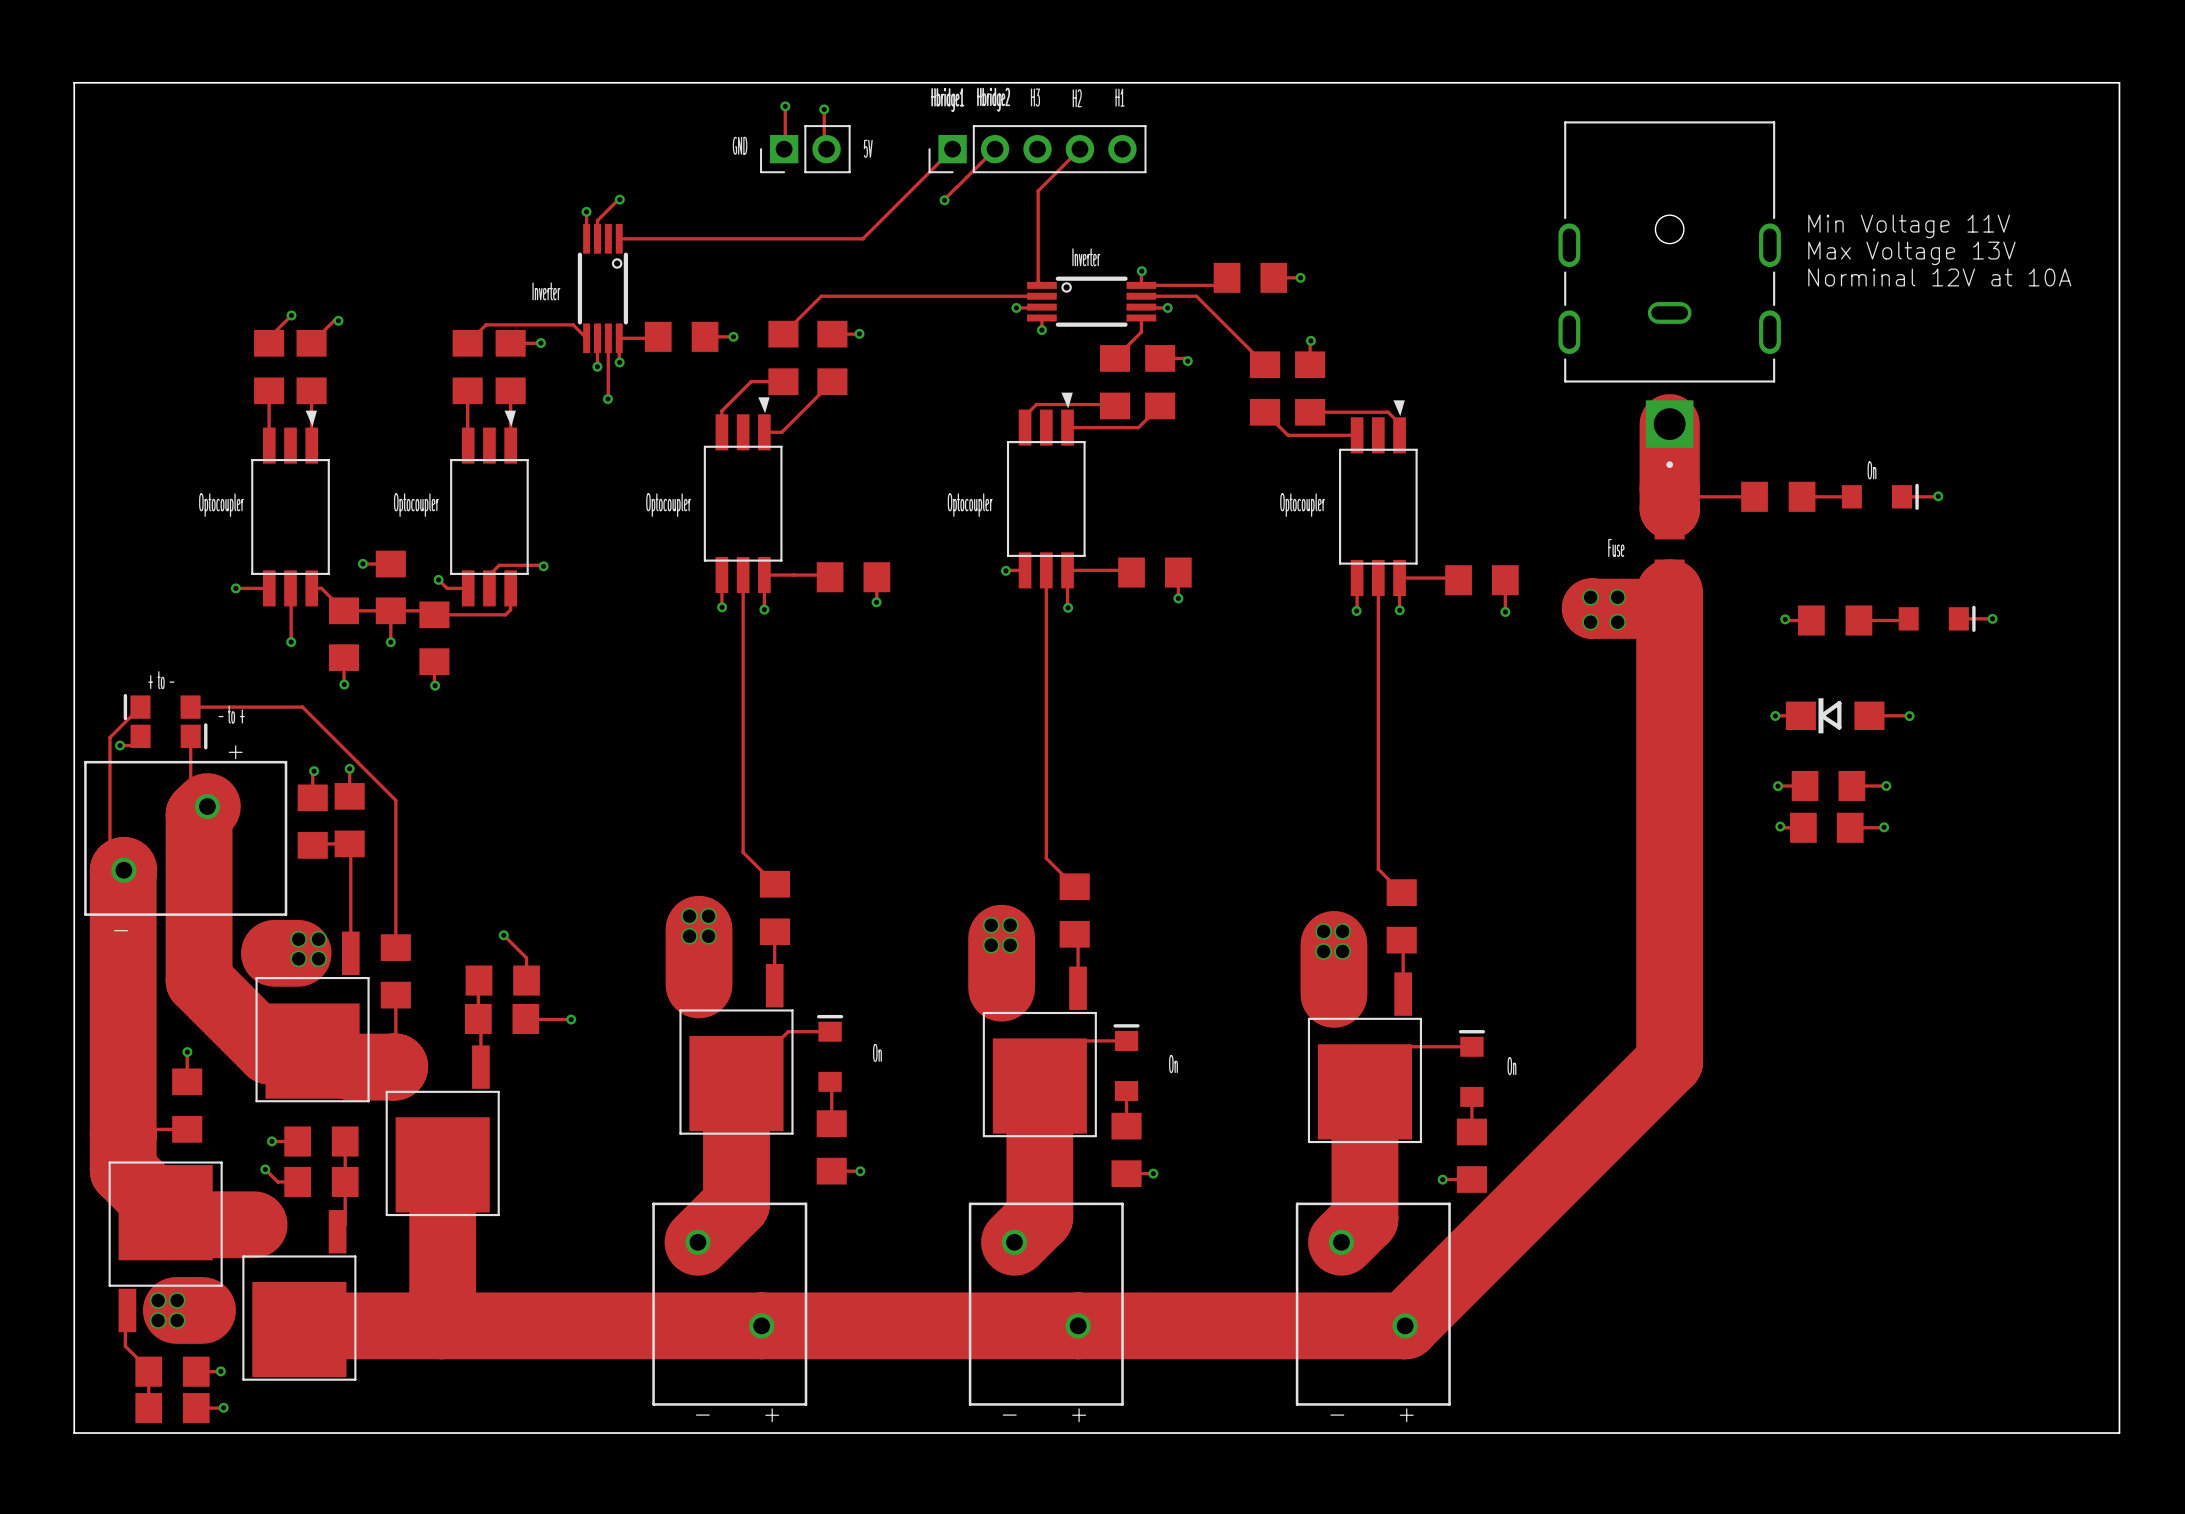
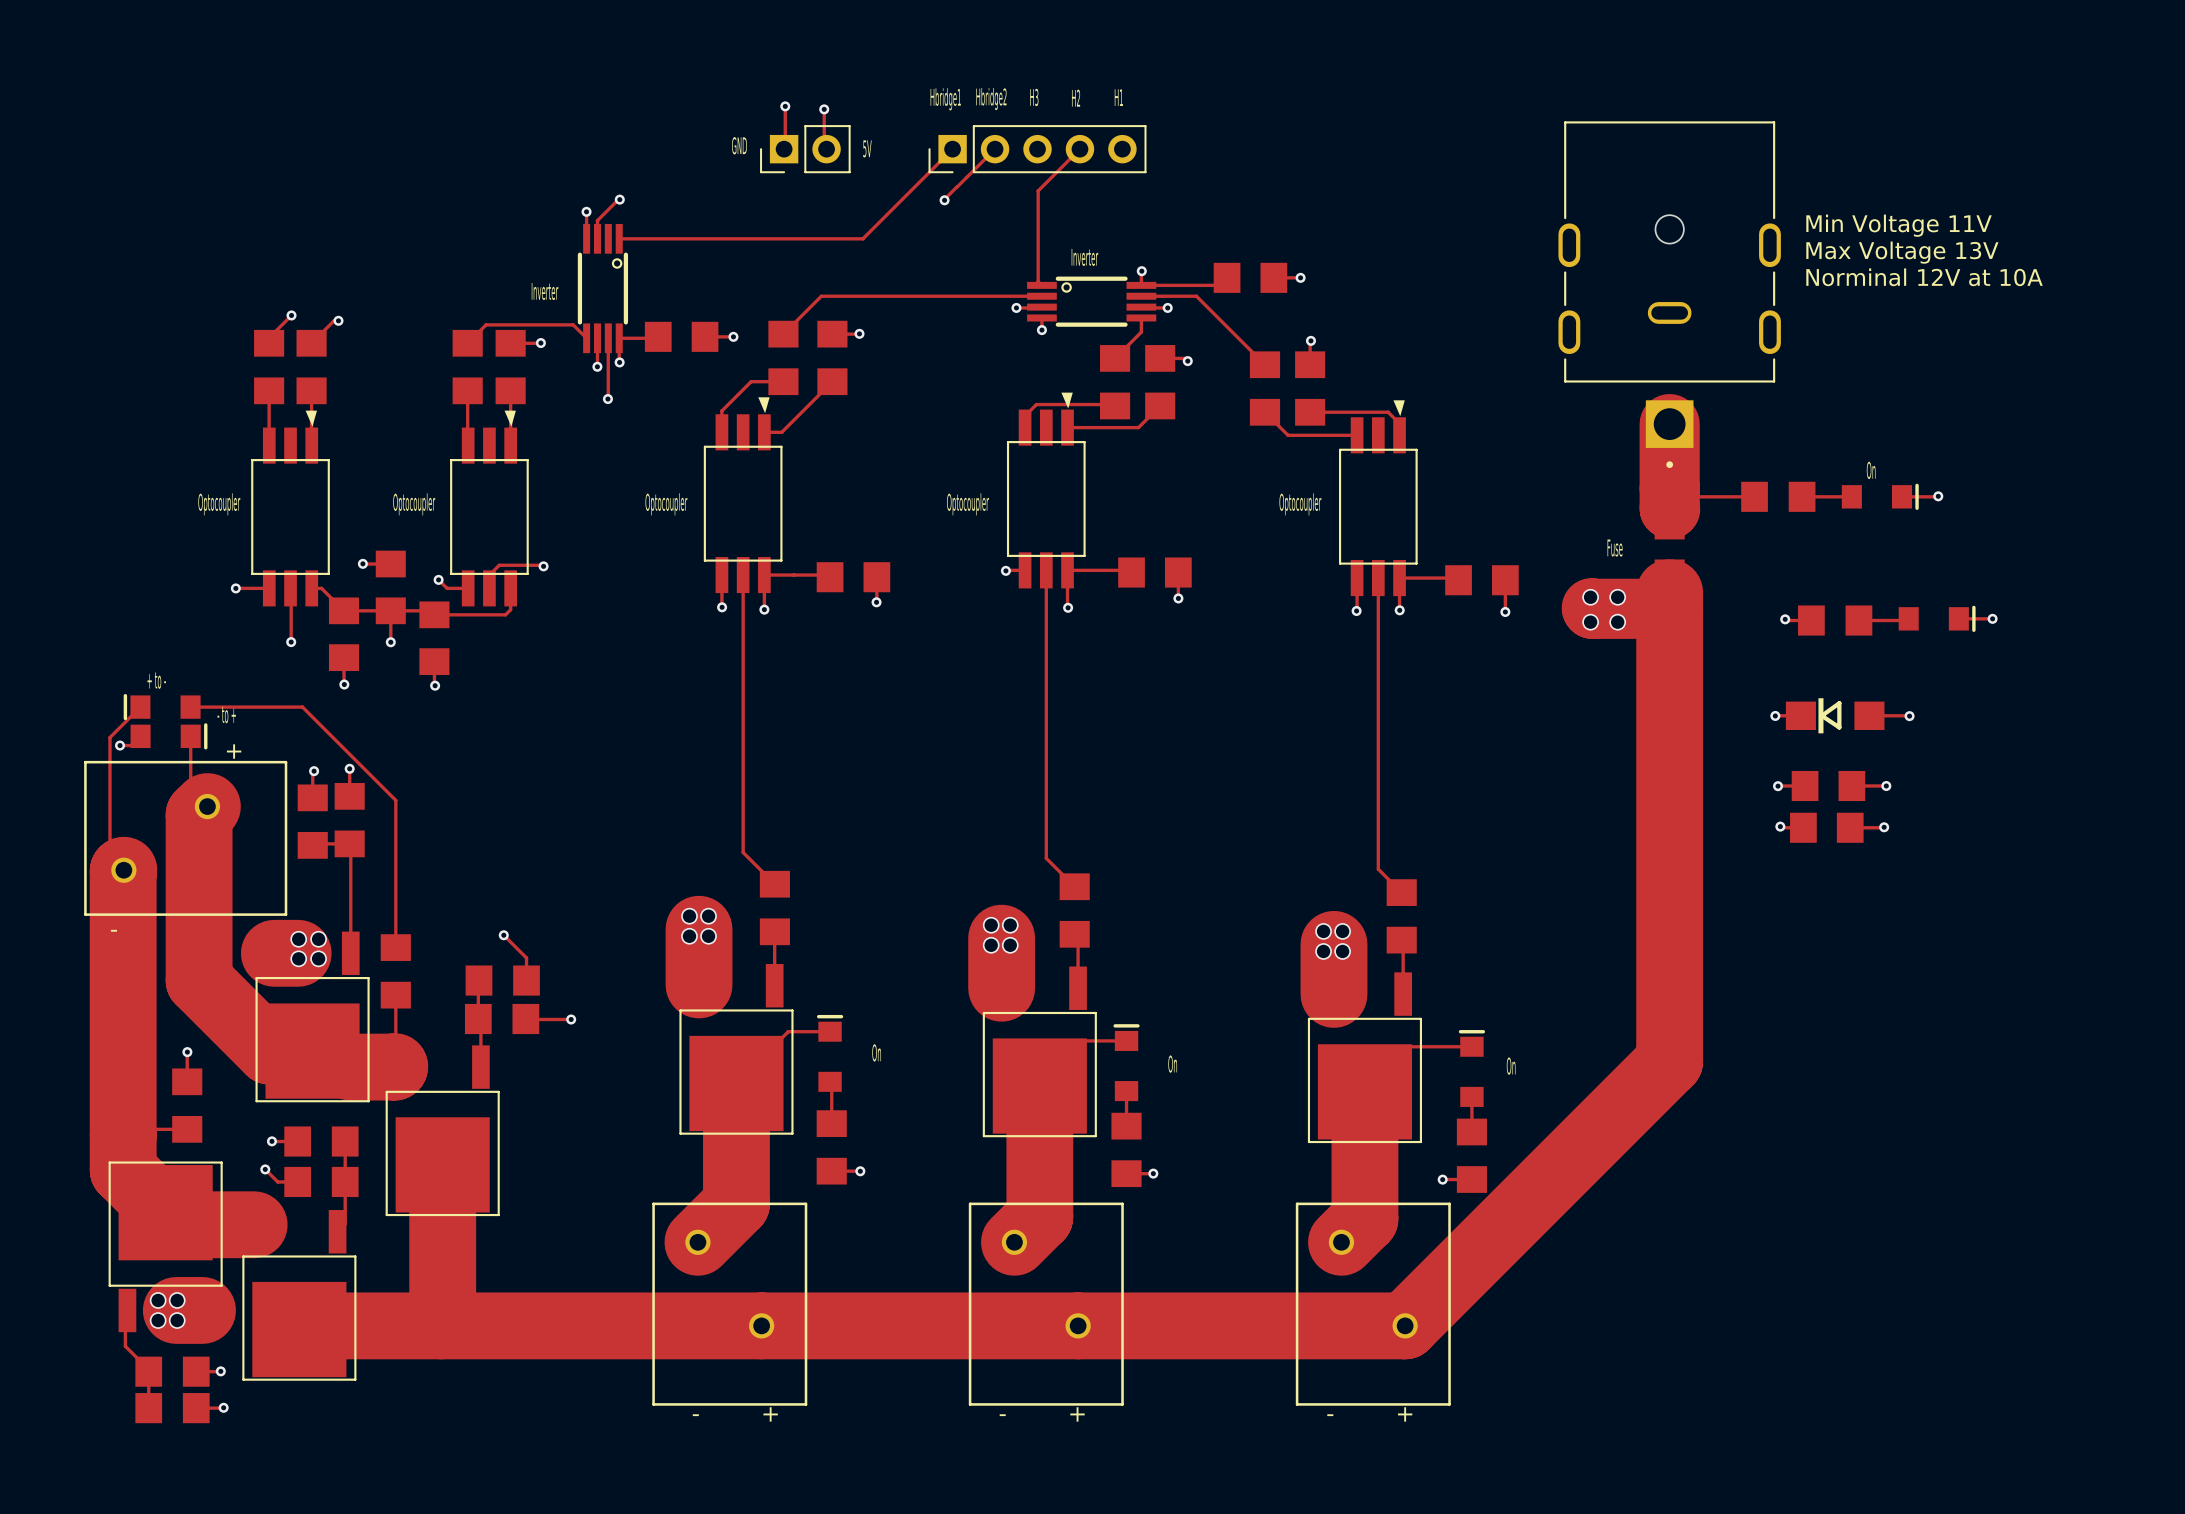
board edge: (74, 82) (2119, 82) (2119, 1433) (74, 1433) (74, 82) -> none

